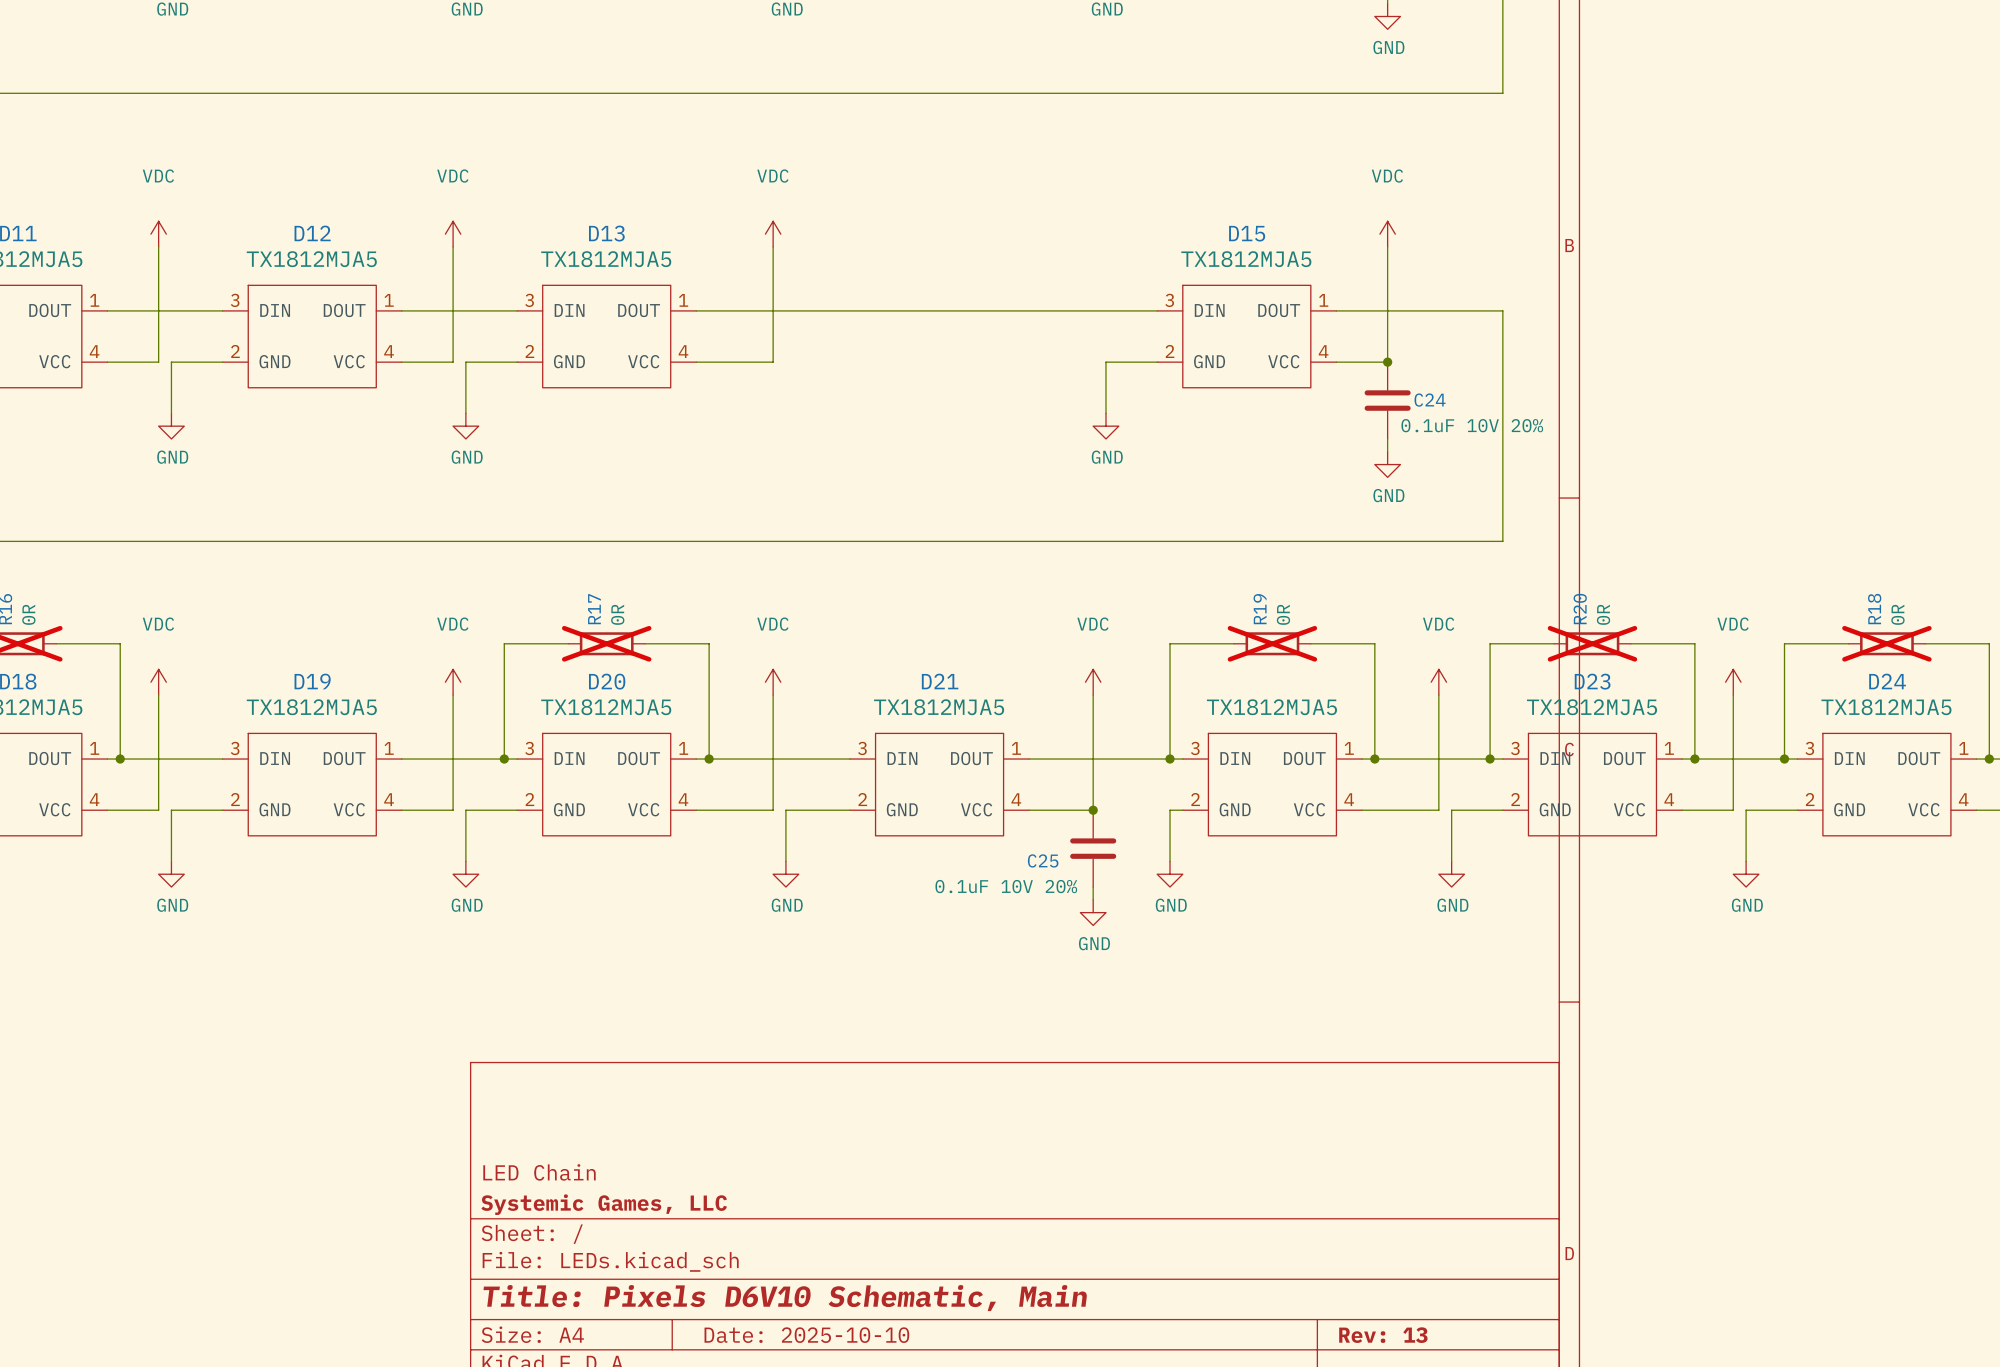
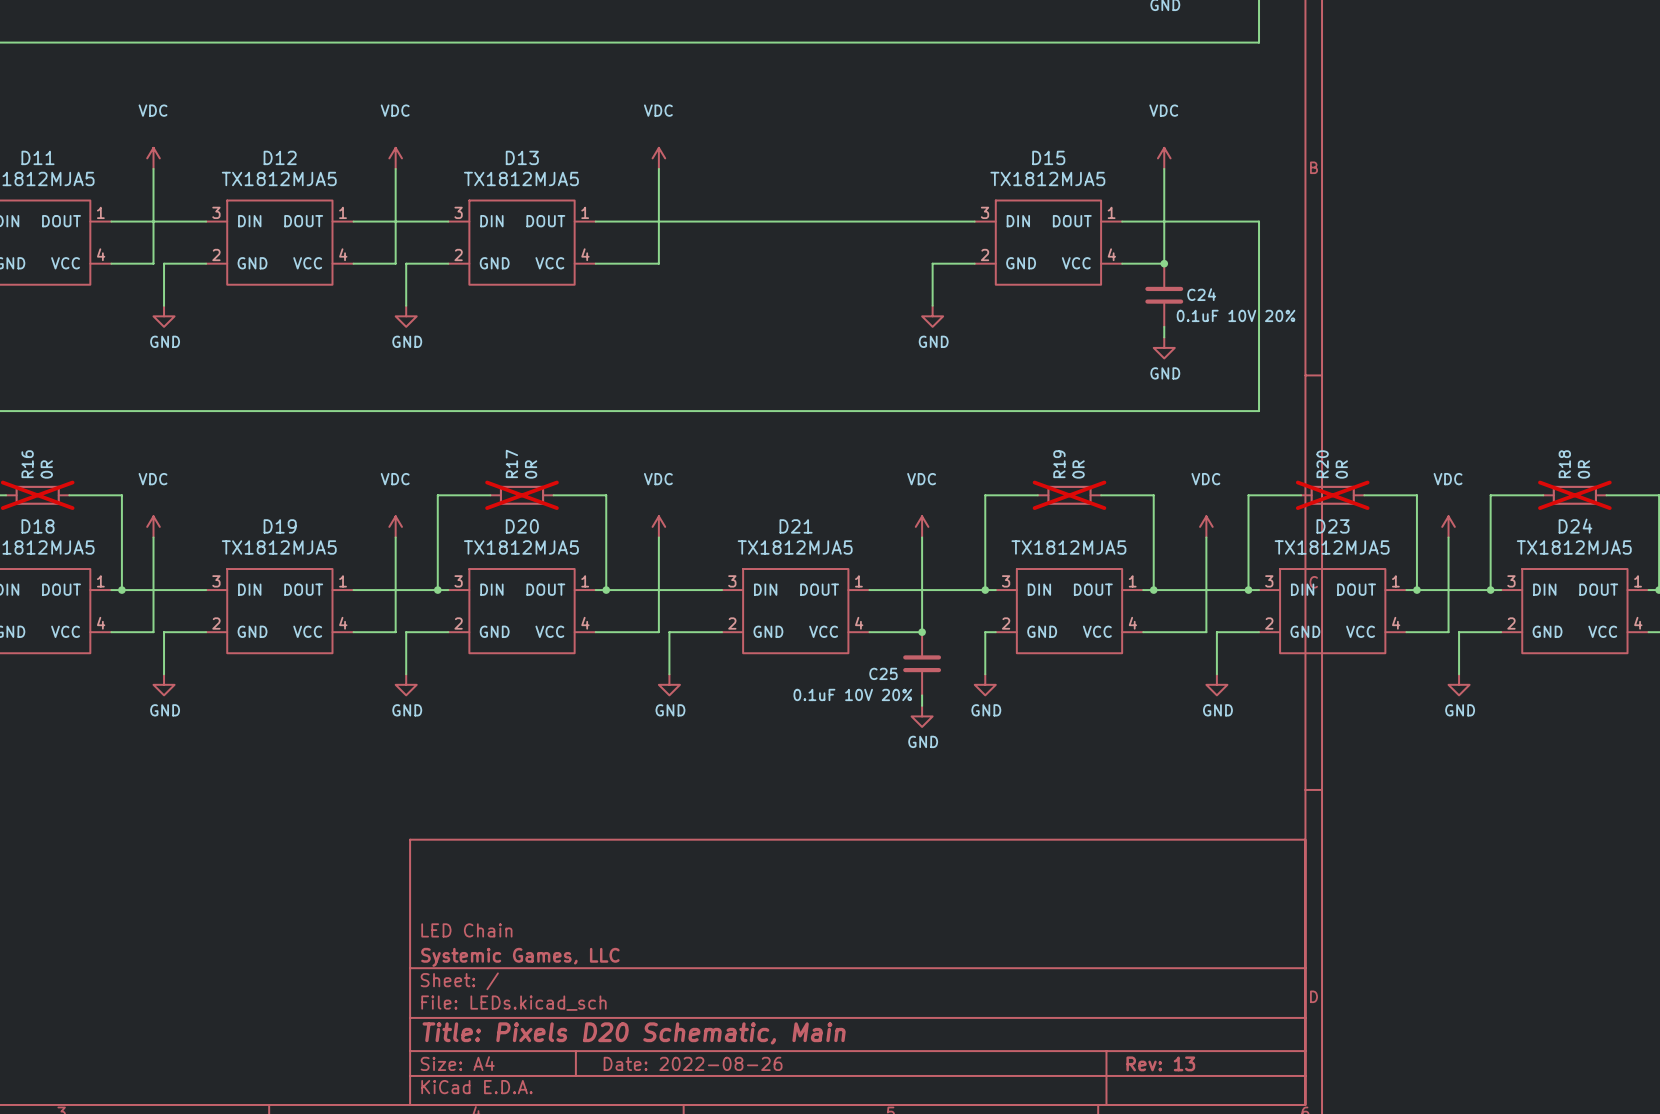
title block: Title: Pixels D6V10 Schematic, Main (785, 1298) -> Title: Pixels D20 Schematic, Main (634, 1033)
title block: Date: 2025-10-10 (806, 1335) -> Date: 2022-08-26 (693, 1063)

